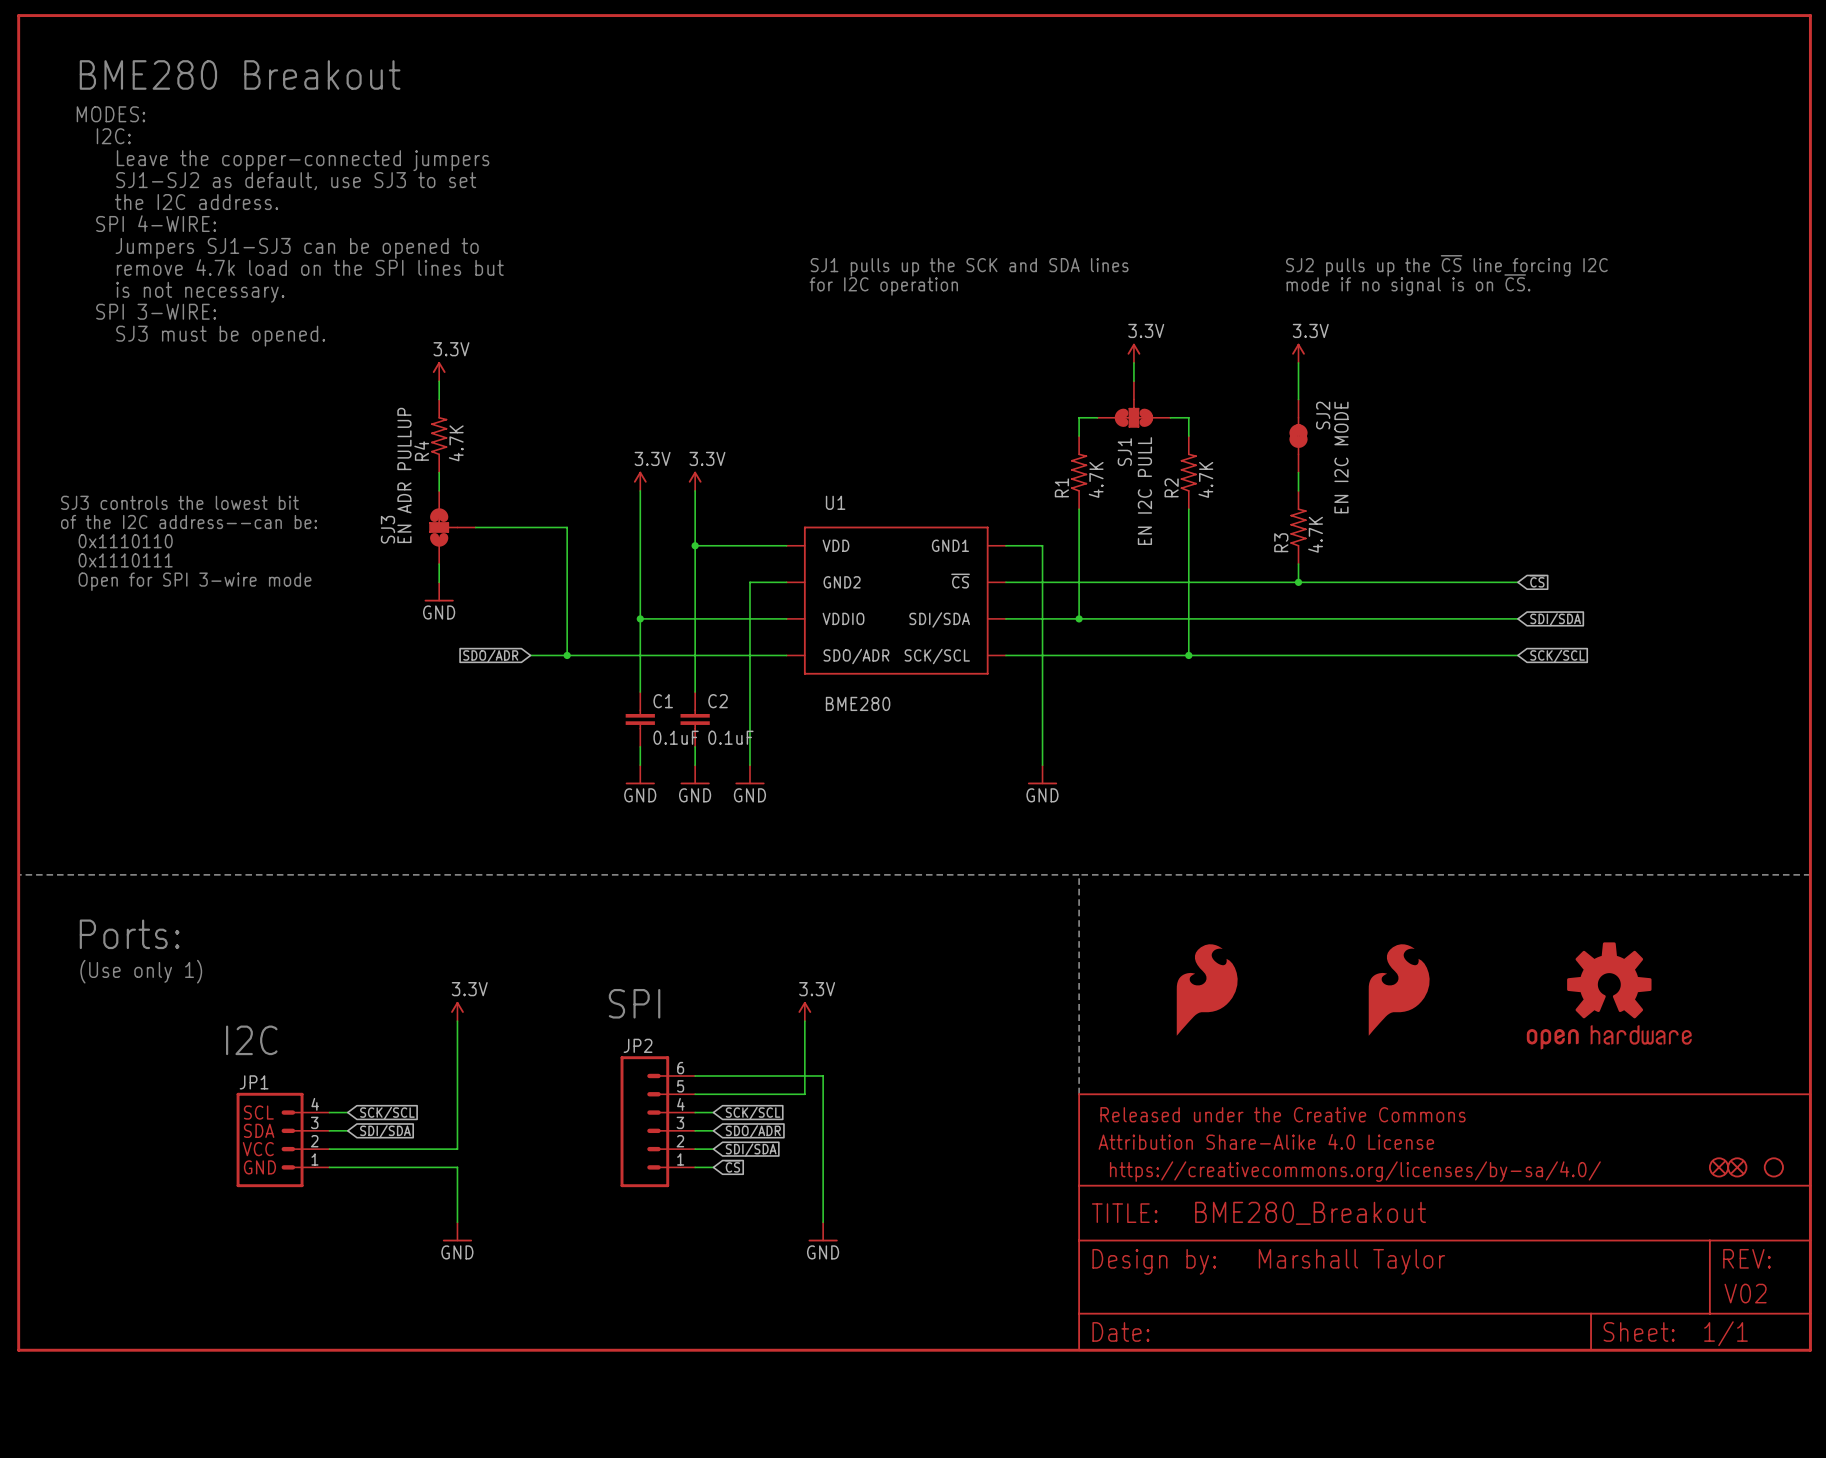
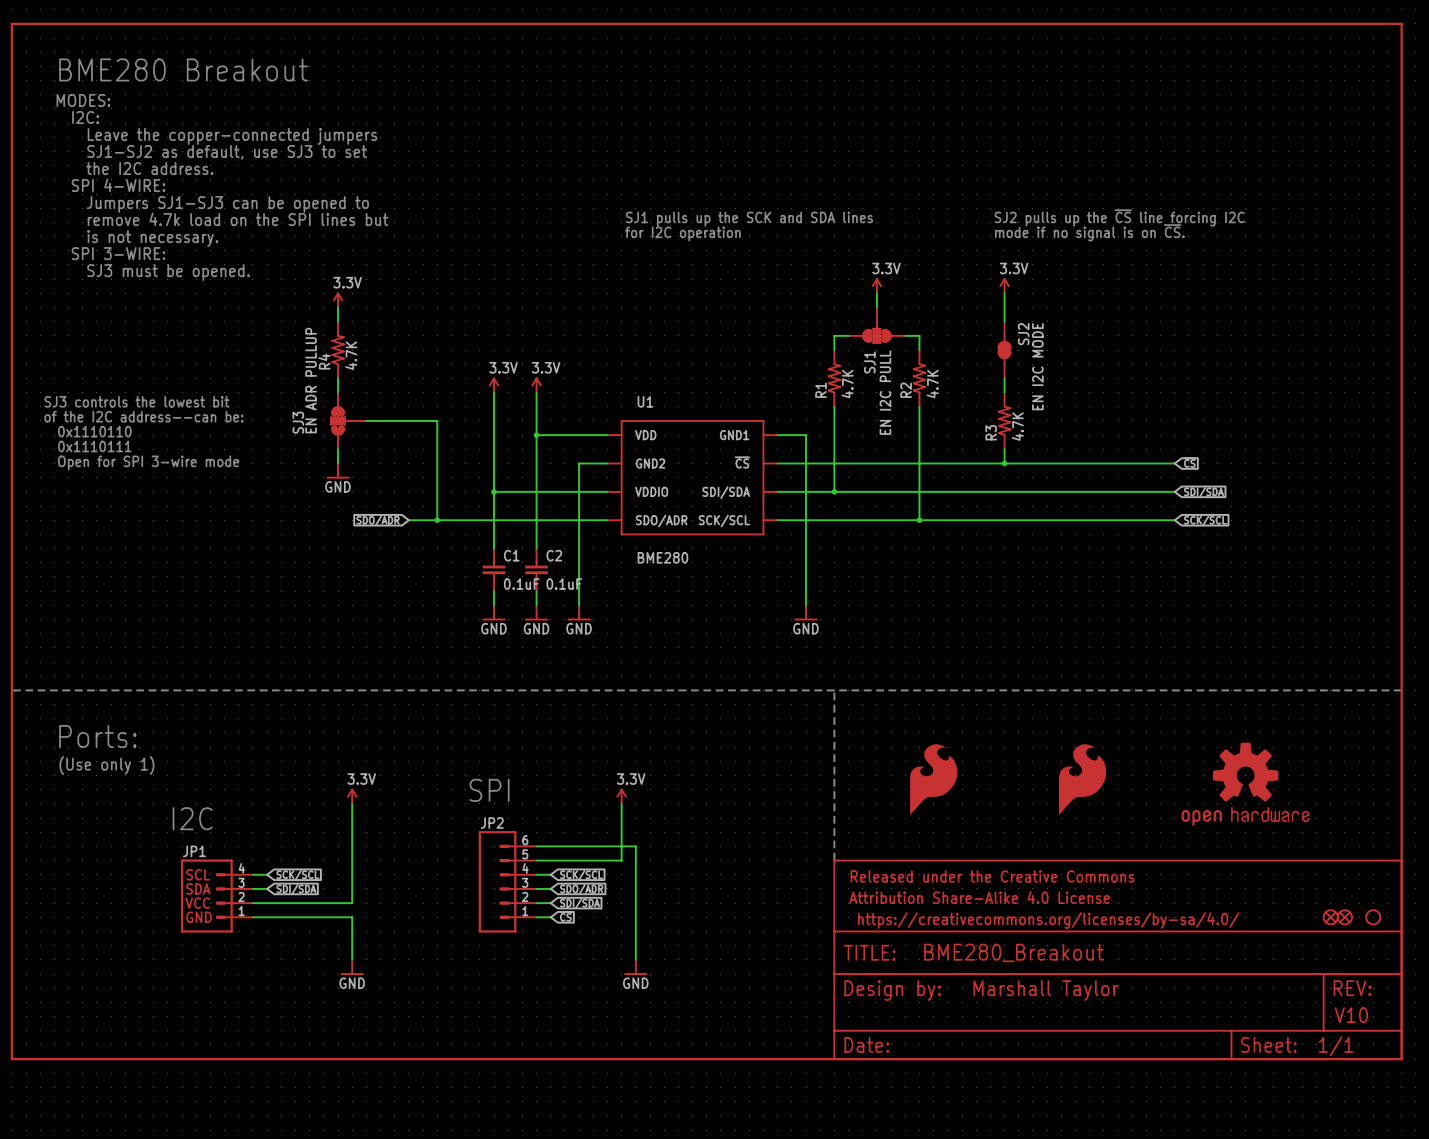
text: V02 (1745, 1293) -> V10 (1351, 1015)

